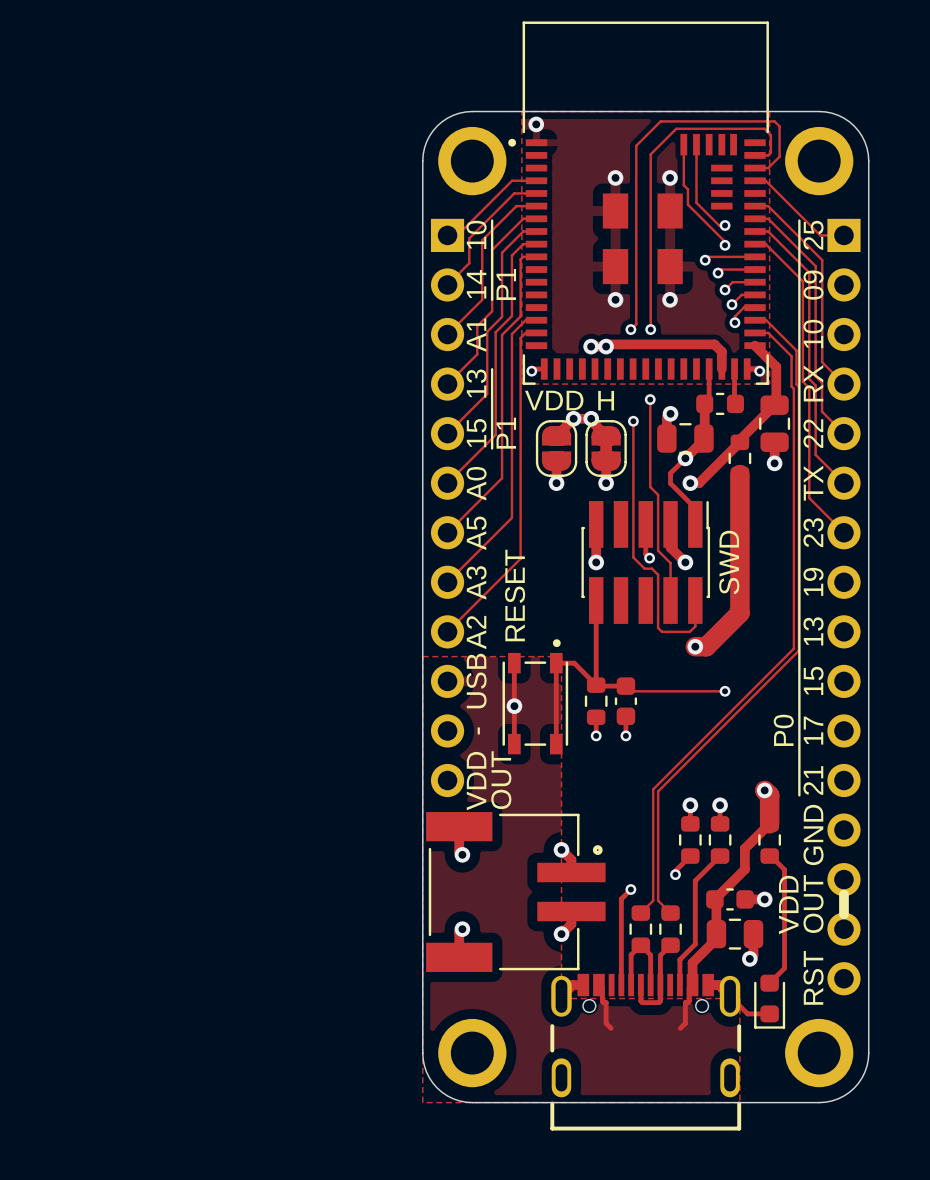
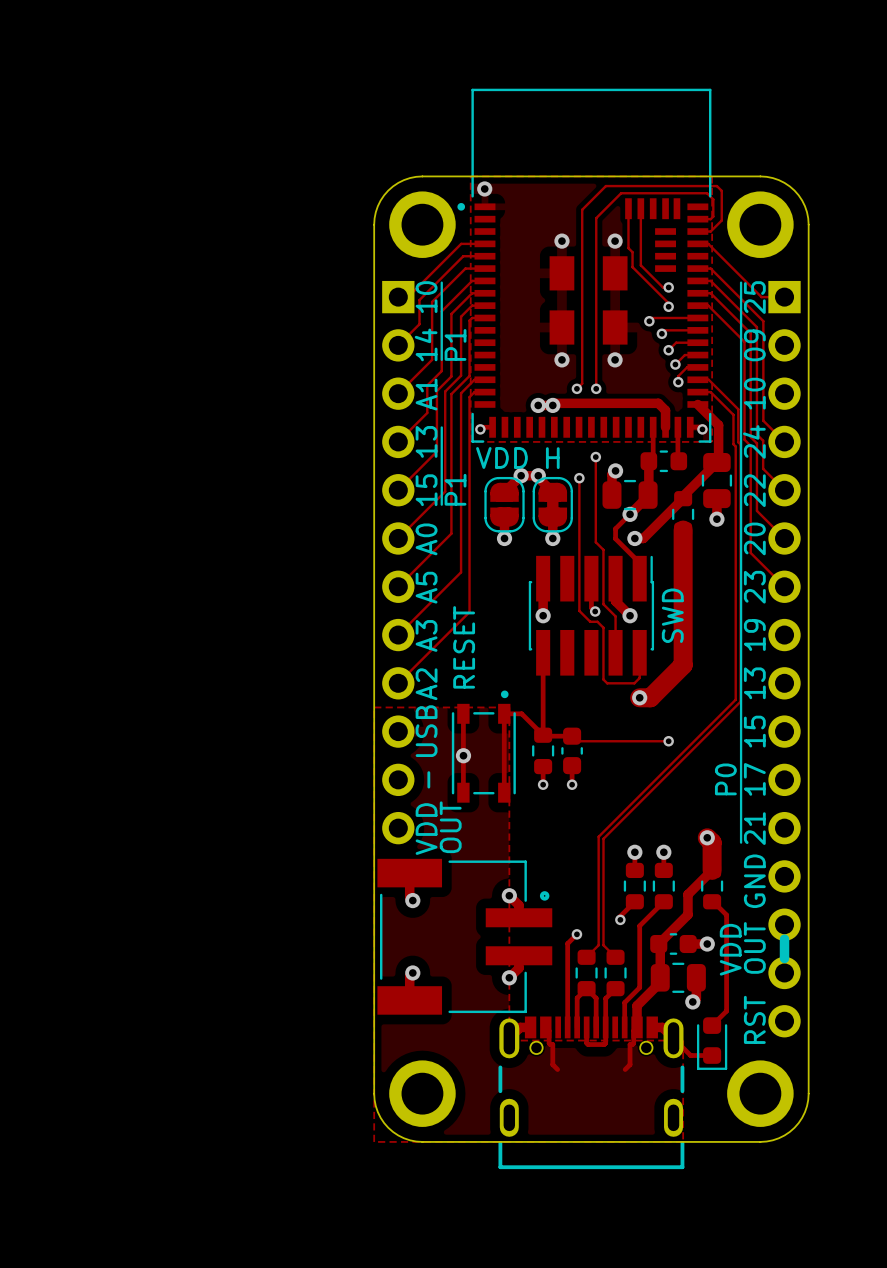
text: RX (813, 383) -> 24 (754, 441)
text: TX (813, 483) -> 20 (754, 538)

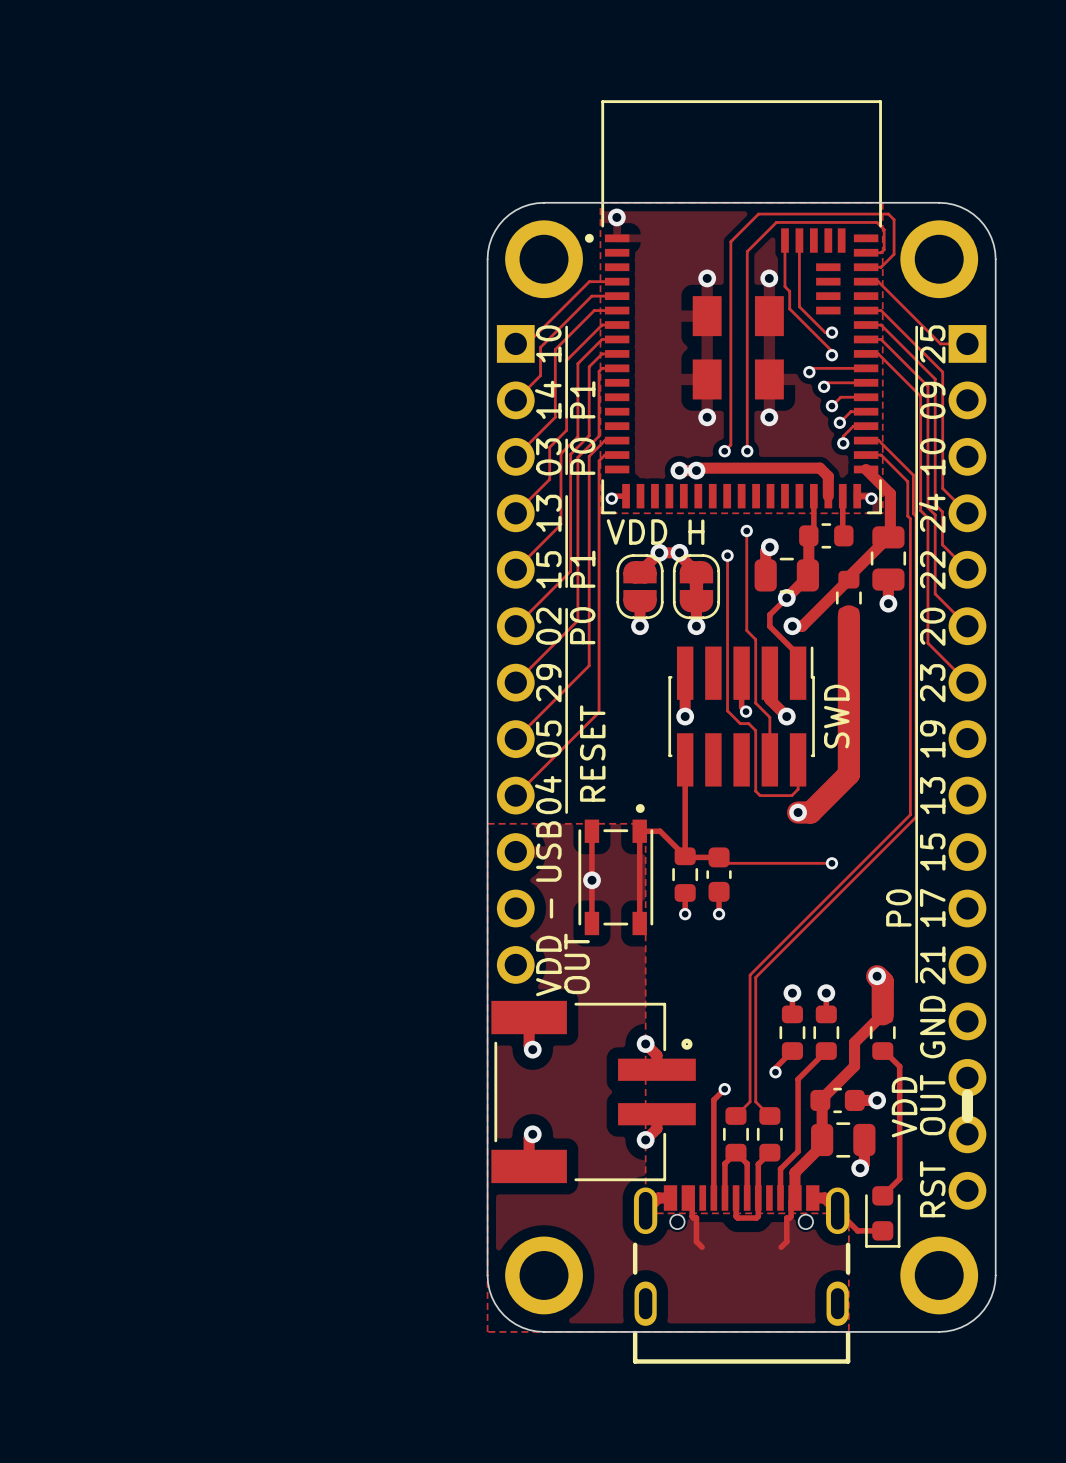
line: none -> (566, 439) (566, 473)
text: none -> P0 (582, 456)
text: A1 (426, 394) -> 03 (548, 456)
line: none -> (566, 609) (566, 812)
text: none -> P0 (582, 625)
text: A0 (426, 539) -> 02 (548, 626)
text: A5 (426, 587) -> 29 (548, 683)
text: A3 (426, 635) -> 05 (548, 739)
text: A2 (426, 684) -> 04 (548, 795)

